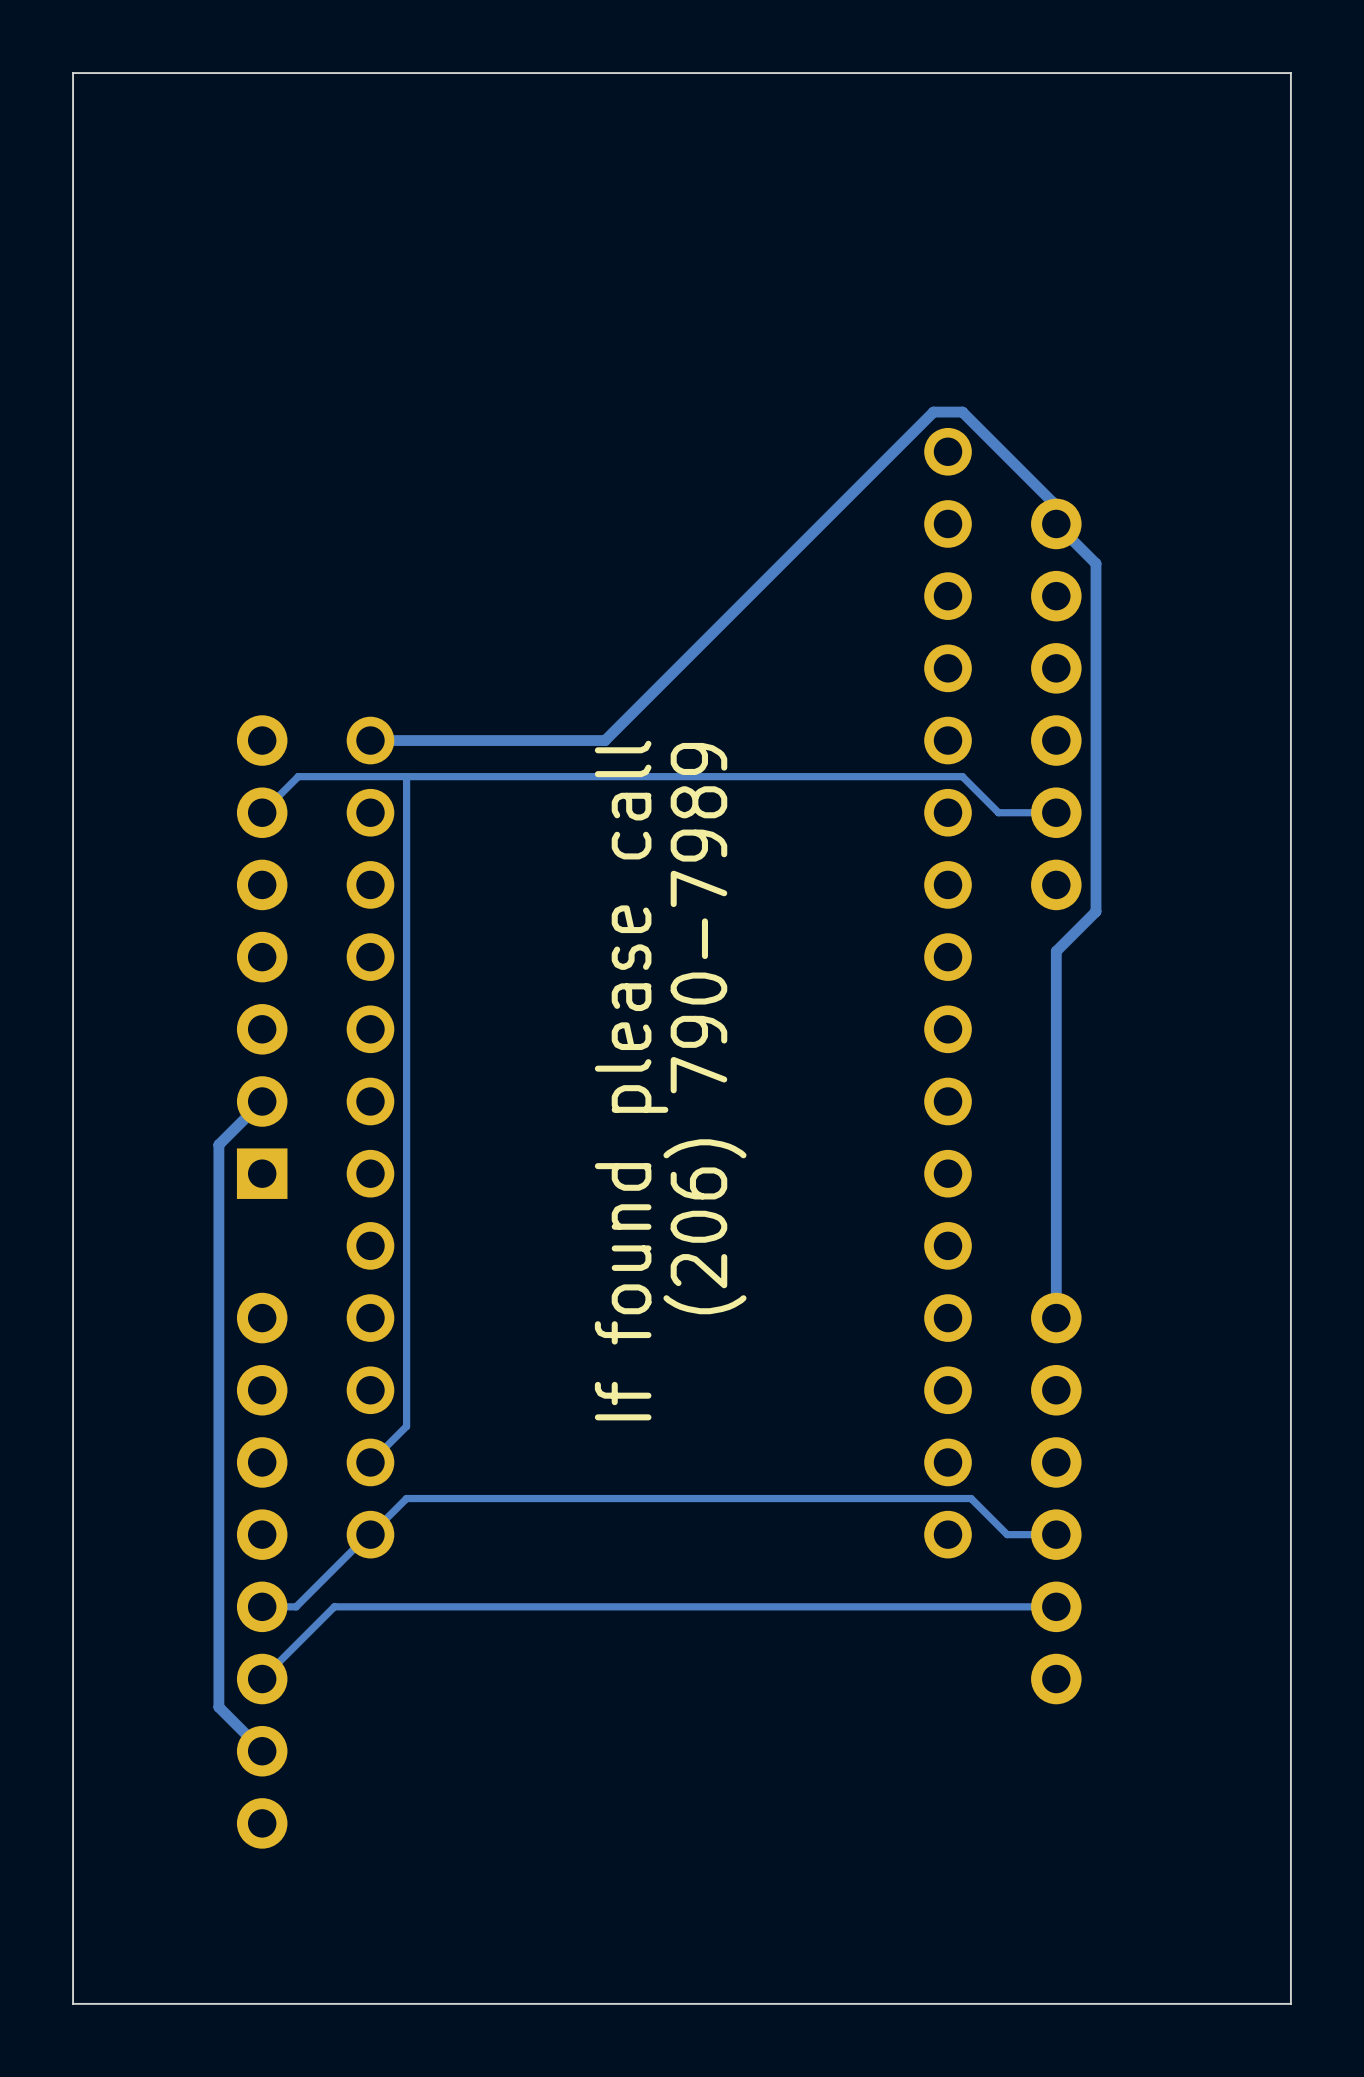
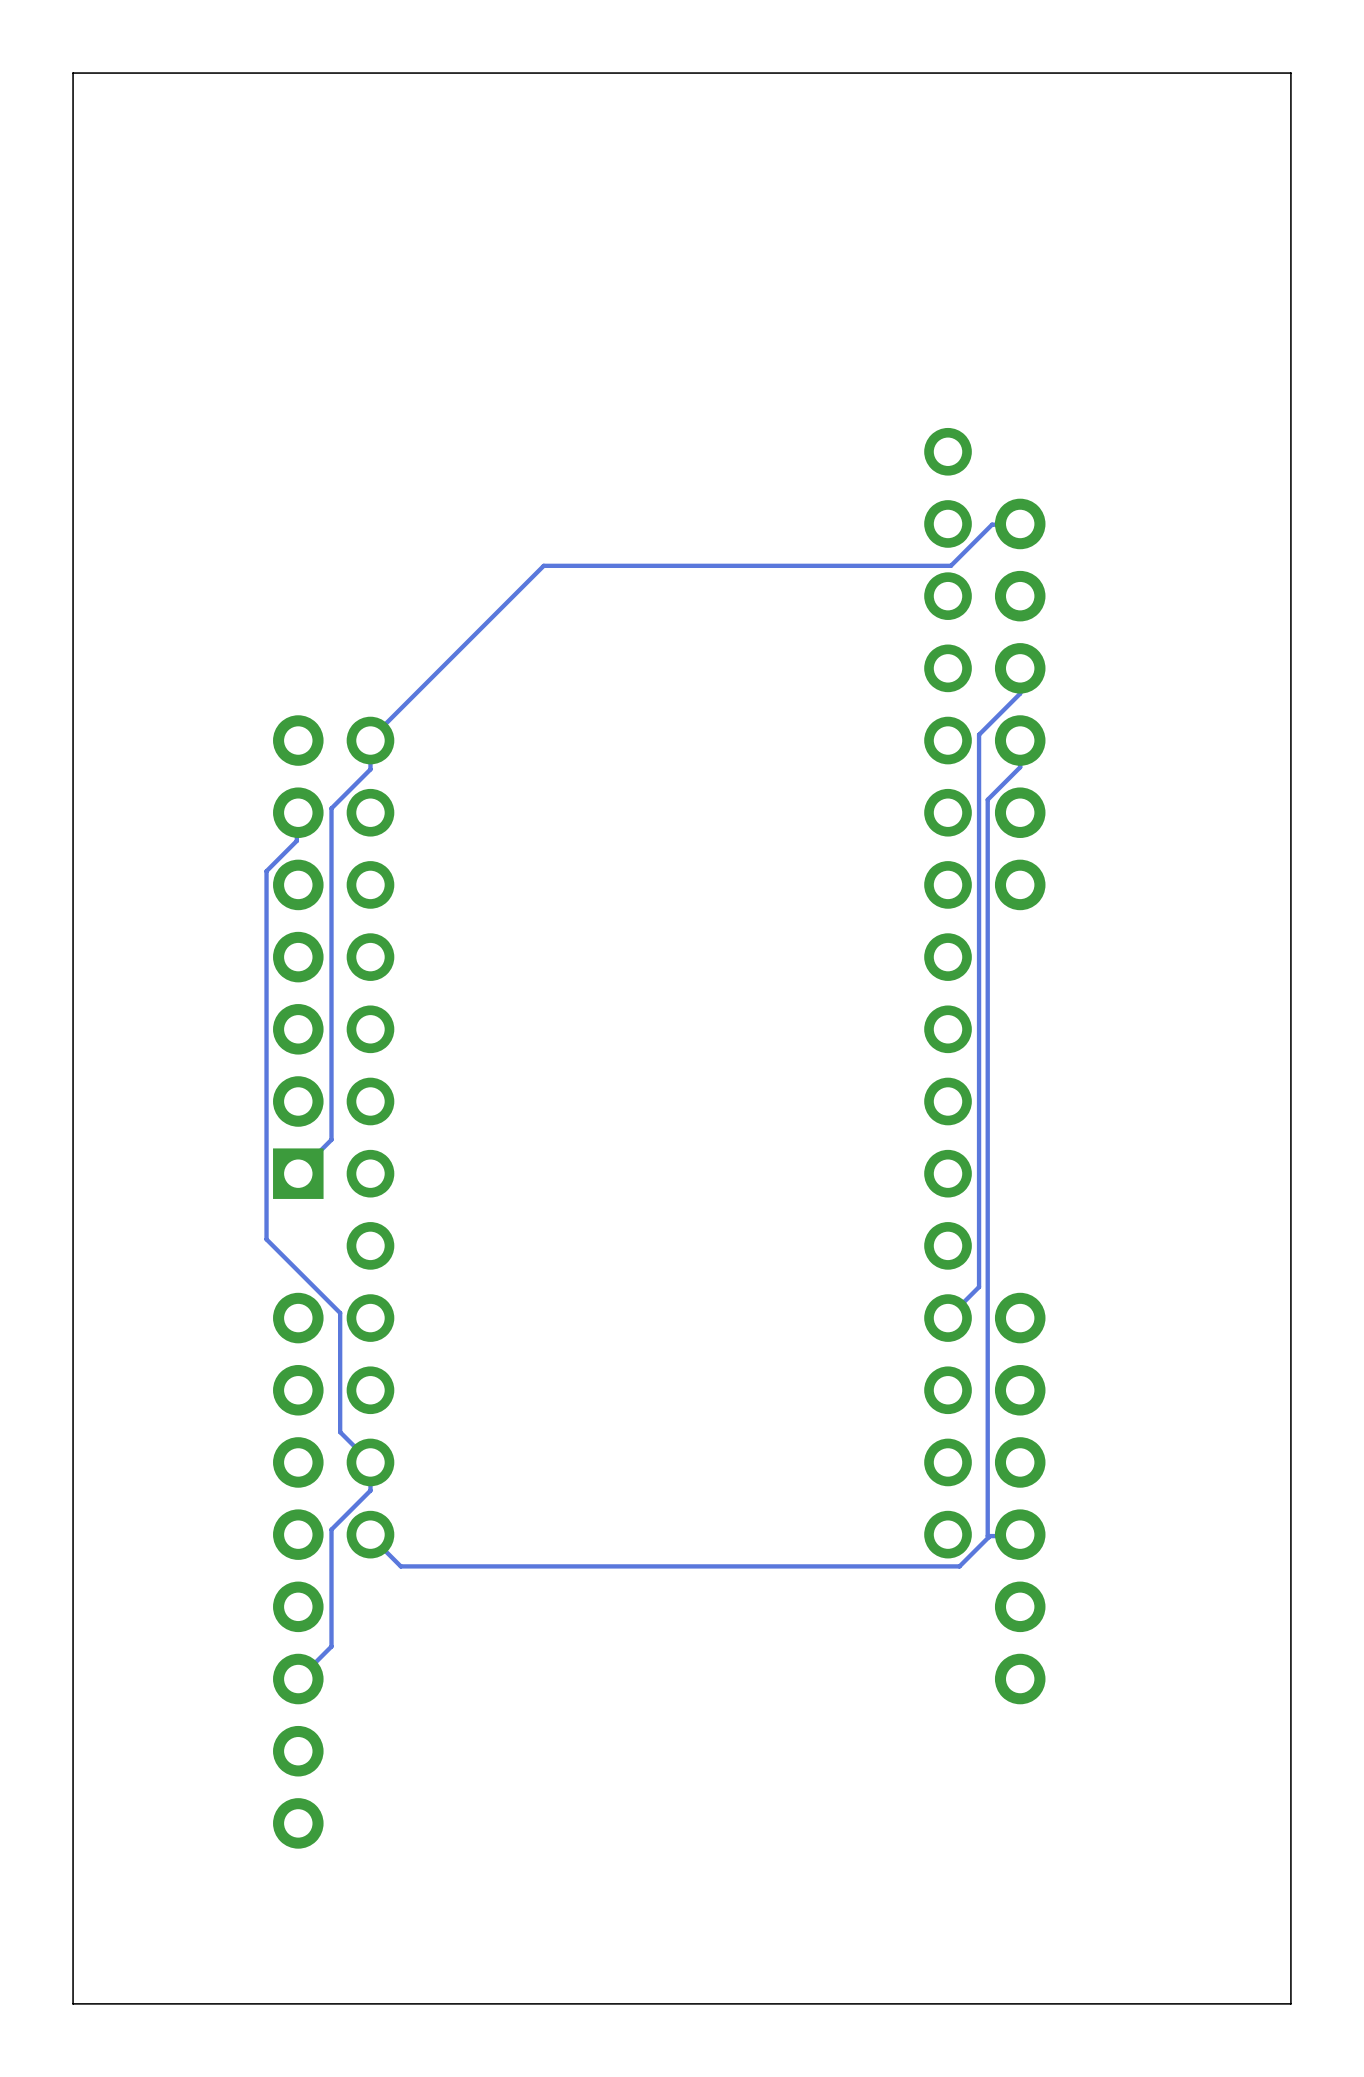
track: none -> (1020, 523) (992, 524) (950, 565) (543, 565) (370, 739) (370, 769) (331, 808) (331, 1139) (298, 1173)
track: none -> (1020, 668) (1020, 693) (979, 734) (979, 1287) (948, 1318)
part position: (1056, 704) -> (1020, 704)
track: (370, 740) (605, 740) (933, 412) (962, 412) (1052, 502) (1052, 520) (1096, 563) (1096, 911) (1056, 951) (1056, 1318) -> none
track: none -> (1020, 740) (1020, 767) (987, 799) (988, 1537)
track: (406, 776) (406, 1426) (370, 1462) -> none
track: none -> (298, 812) (296, 840) (266, 871) (266, 1239) (340, 1313) (340, 1432) (370, 1462) (370, 1490) (331, 1529) (331, 1646) (298, 1679)
track: (1056, 812) (998, 812) (962, 776) (298, 776) (262, 812) -> none
part position: (262, 957) -> (298, 957)
text: (206) 790-7989 (704, 1028) -> none
text: If found please call (631, 1080) -> none
track: (262, 1101) (218, 1144) (218, 1707) (262, 1751) -> none
part position: (1056, 1498) -> (1020, 1498)
track: none -> (1020, 1534) (989, 1536) (959, 1566) (400, 1566) (370, 1534)
track: (1056, 1534) (1007, 1534) (971, 1498) (406, 1498) (296, 1606) (262, 1606) -> none
part position: (262, 1570) -> (298, 1570)
track: (1056, 1606) (334, 1606) (262, 1679) -> none

